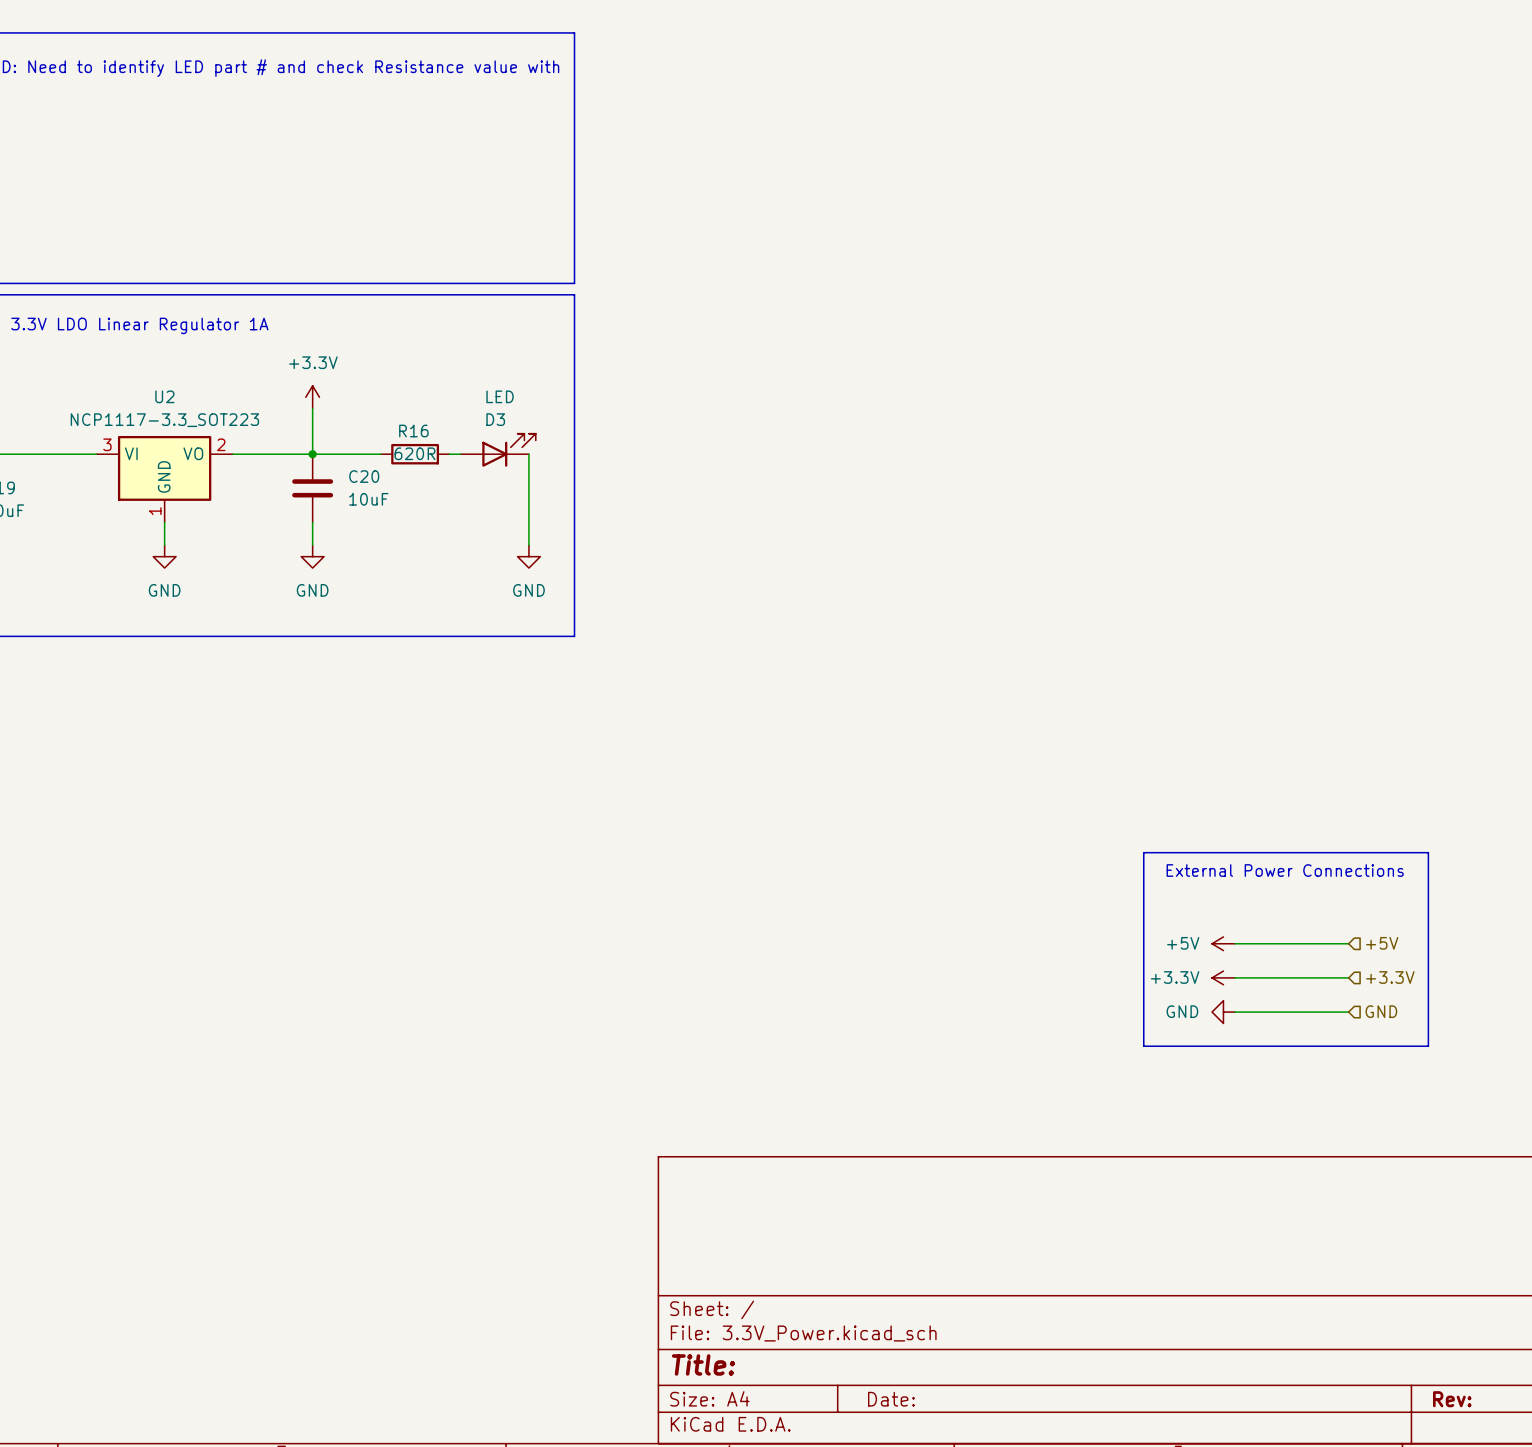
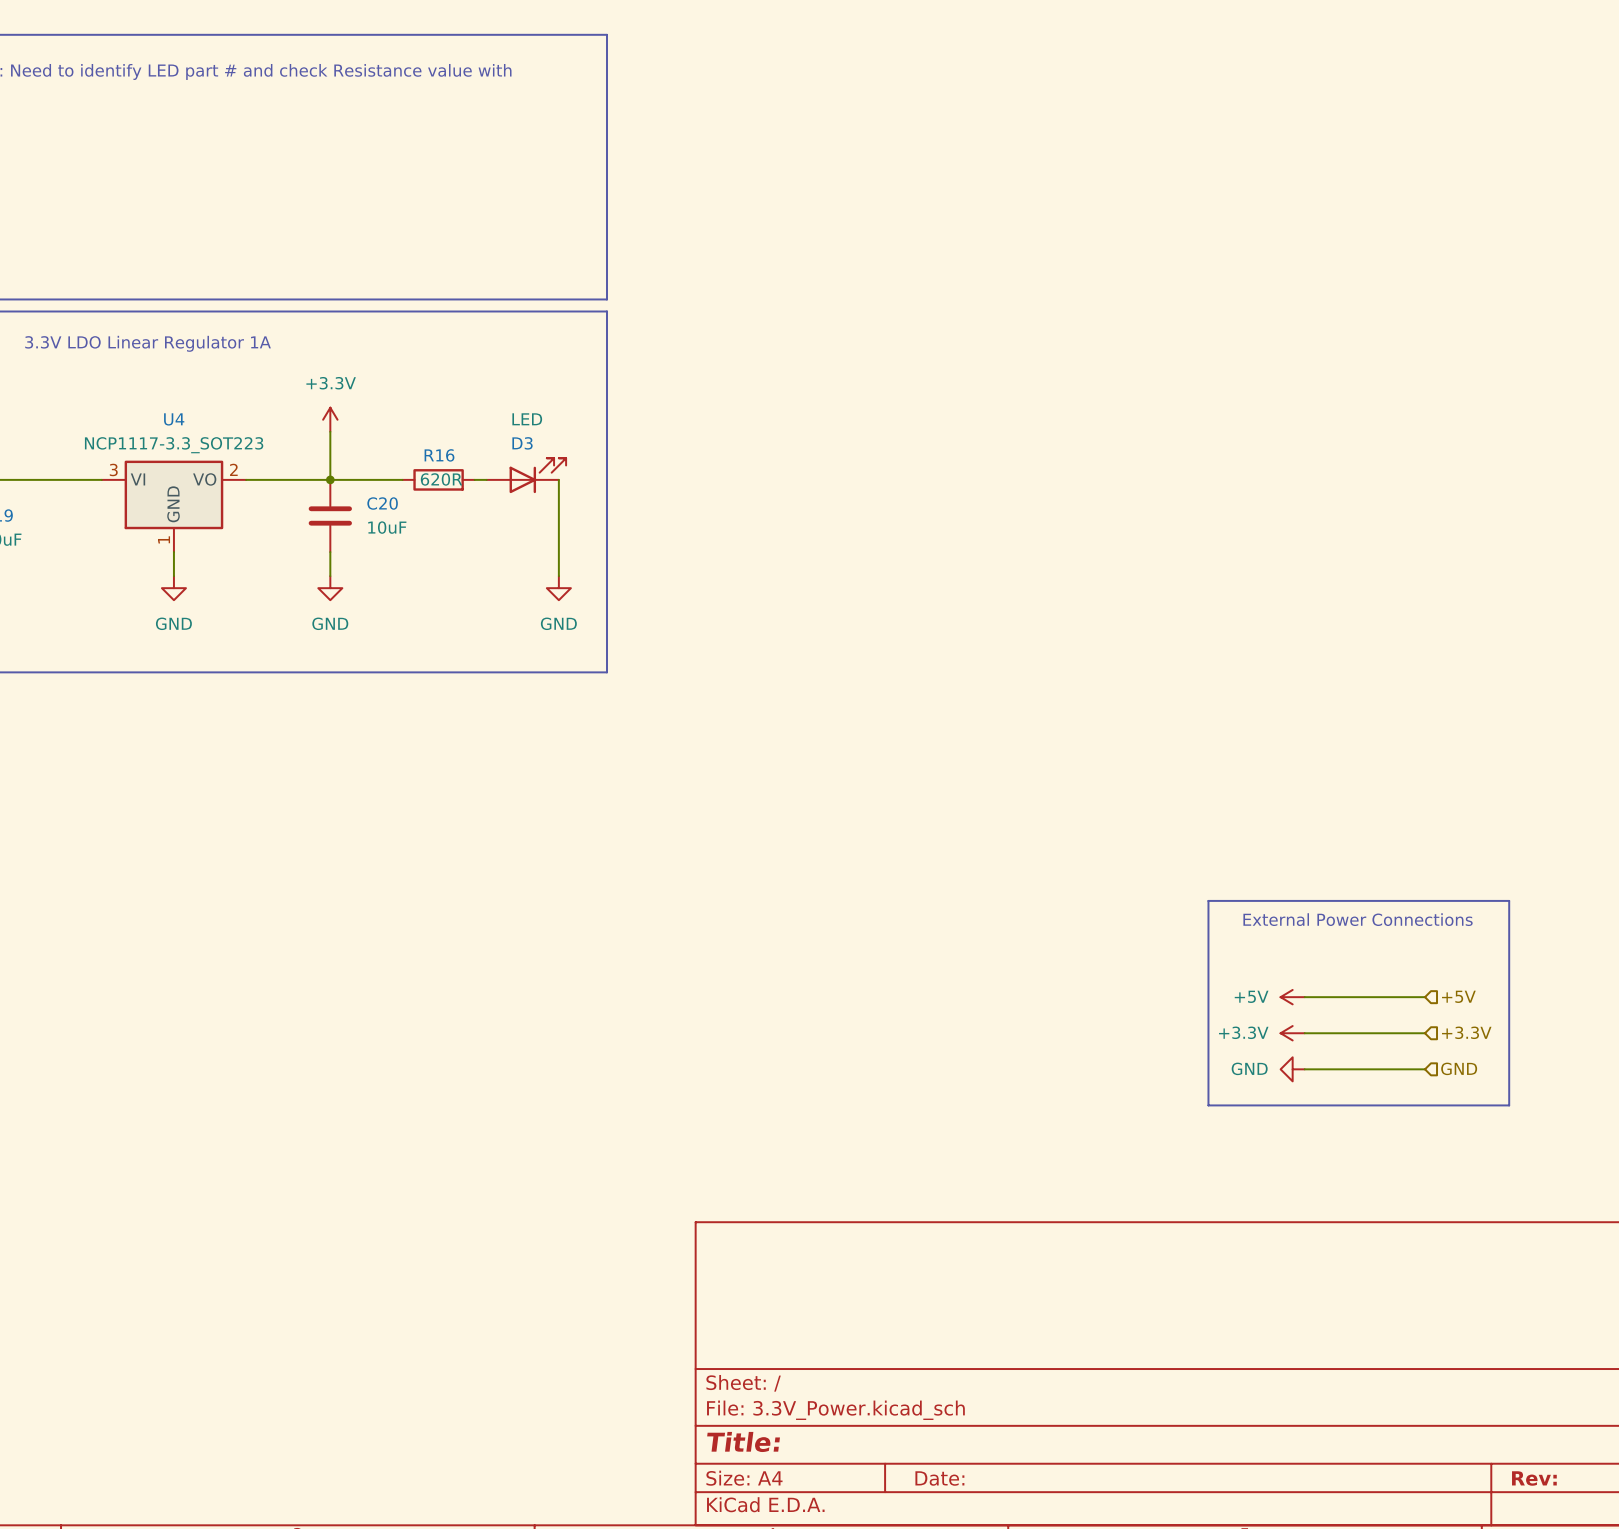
U2 name: U2 (164, 396) -> U4 (174, 419)

